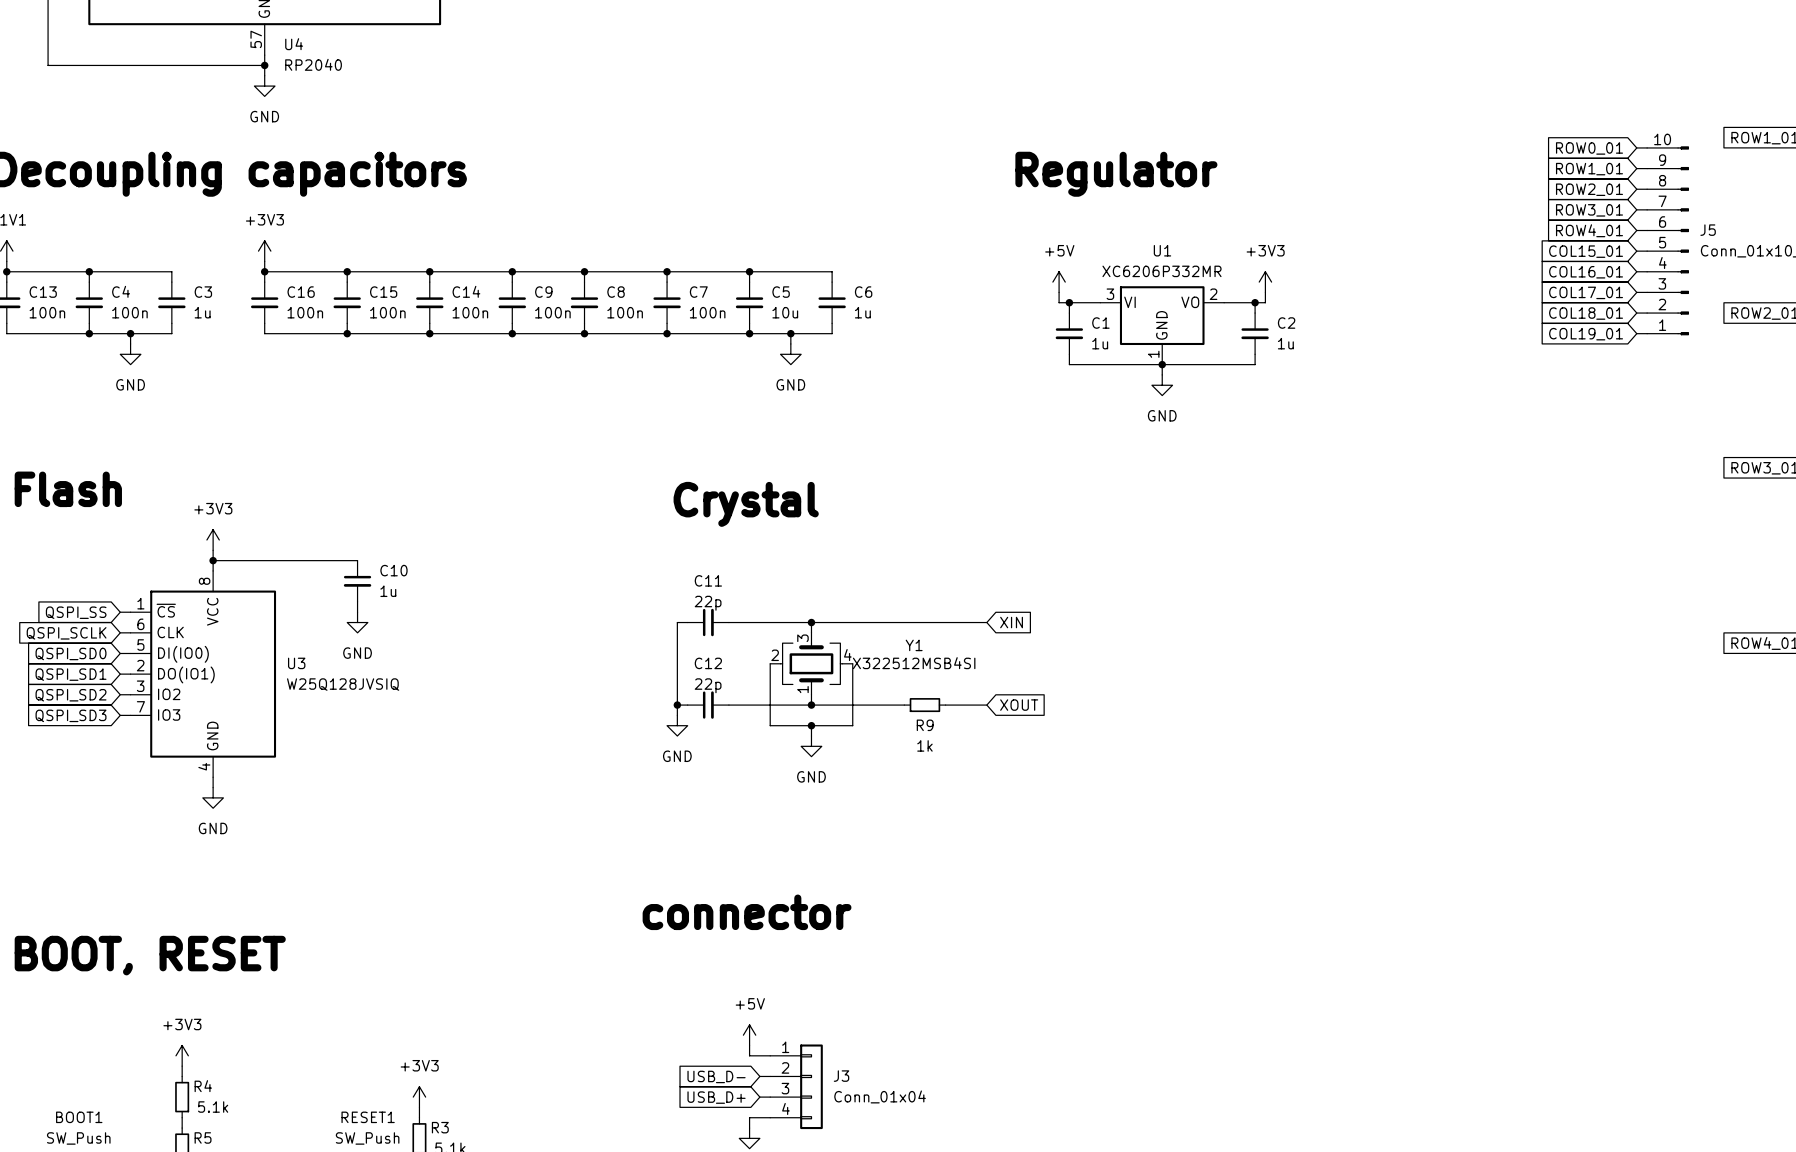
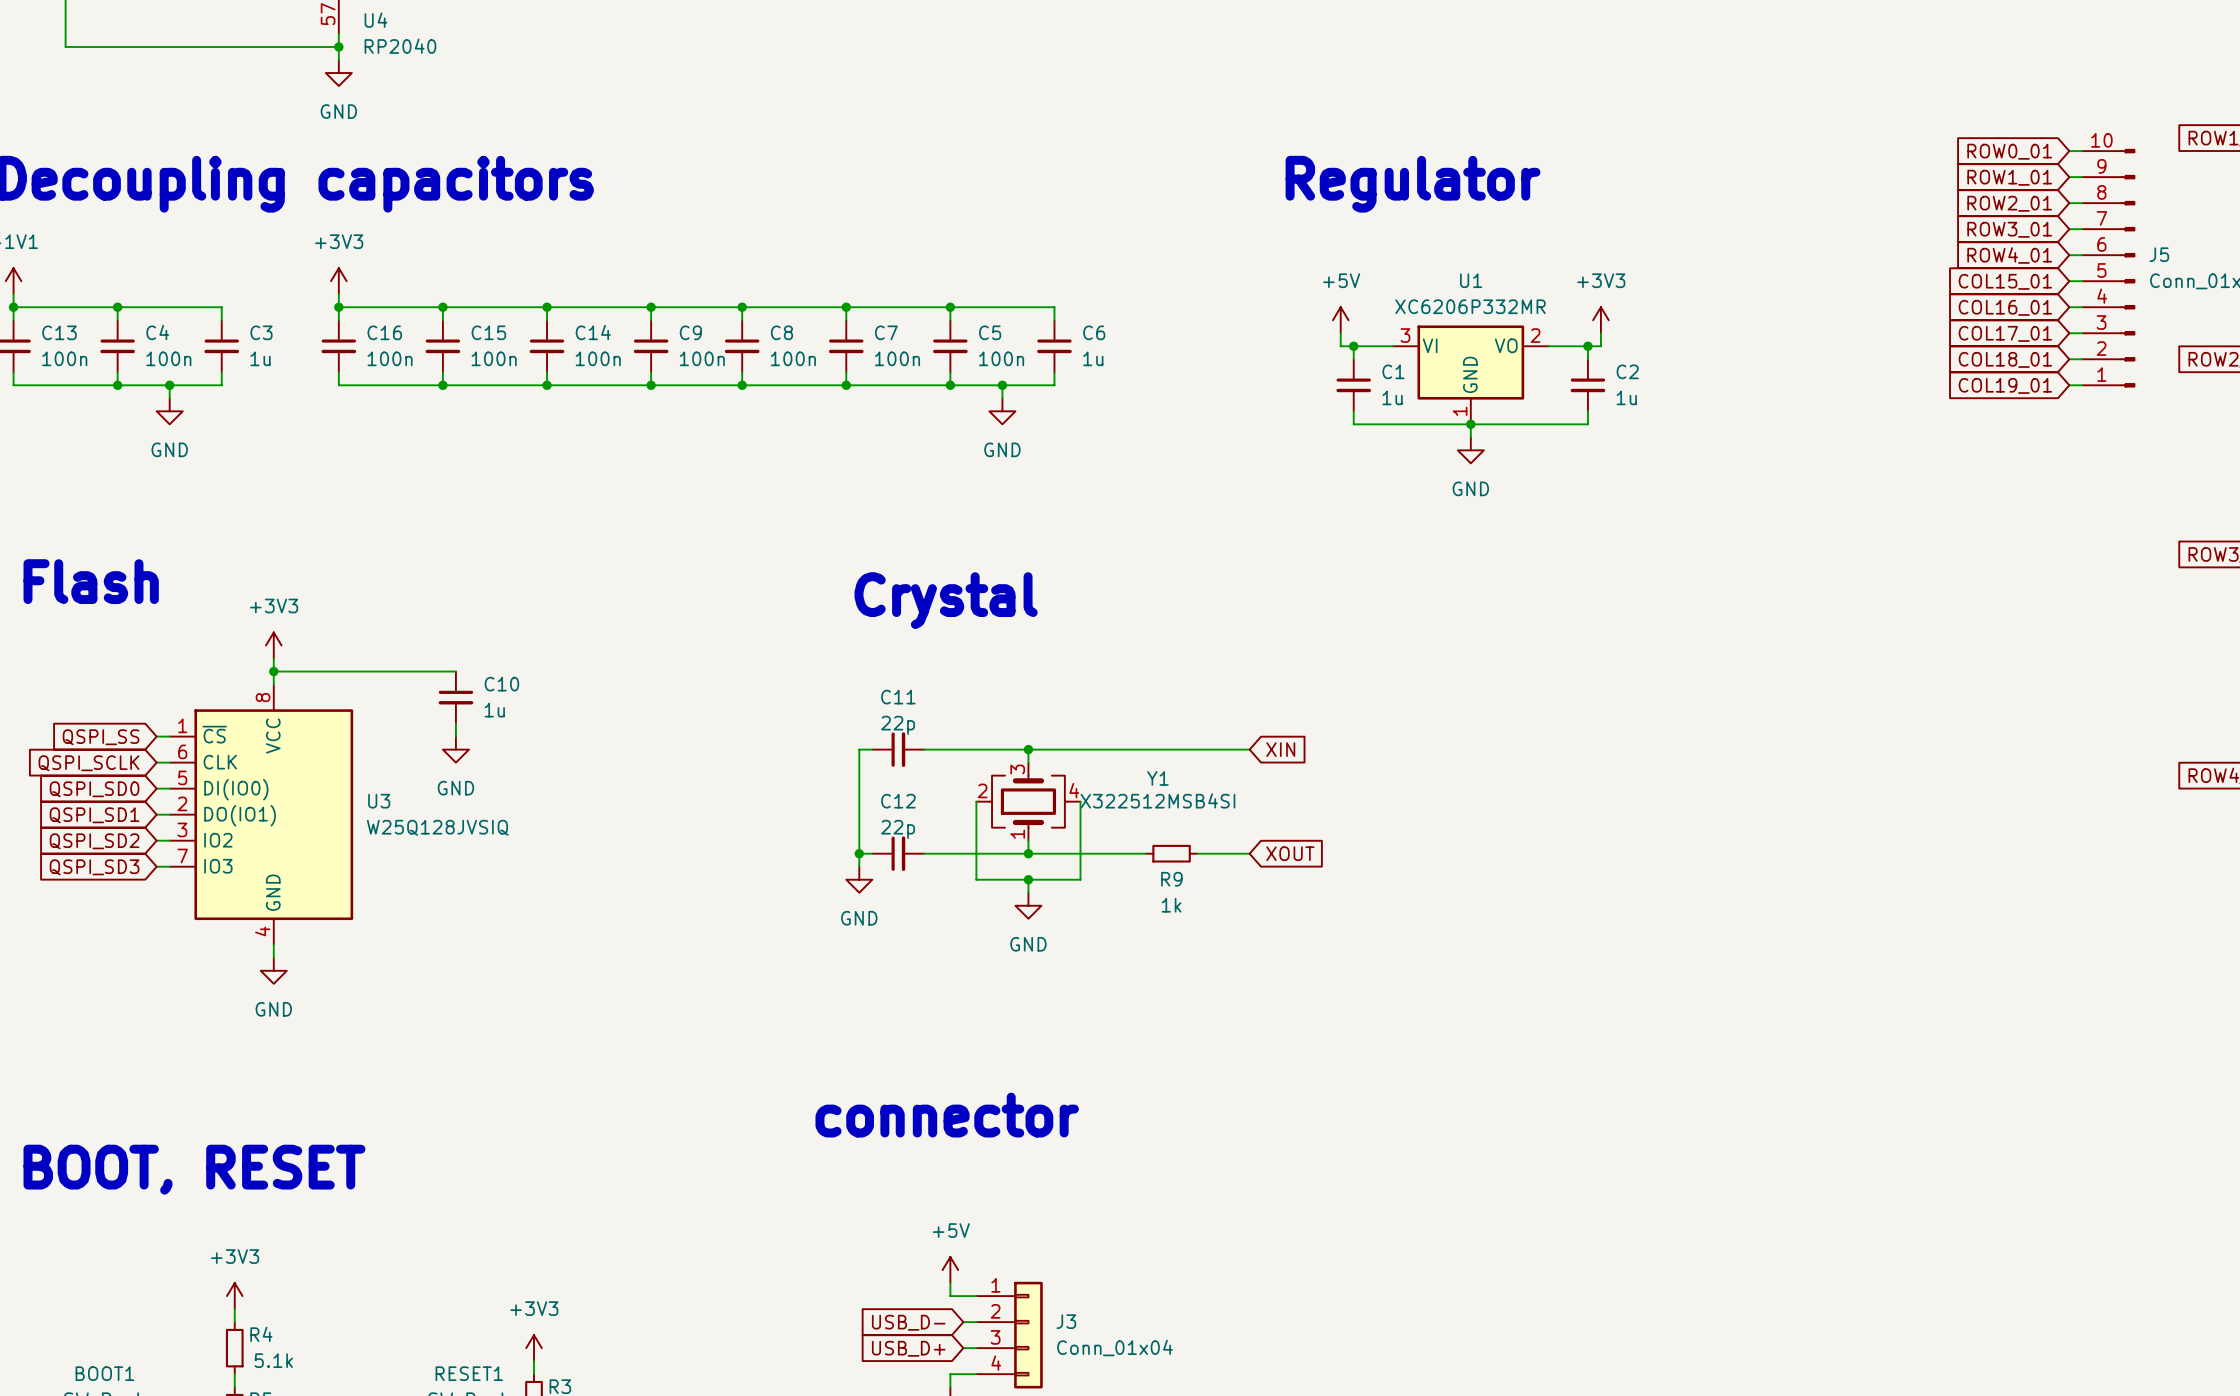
C5 value: 10u (785, 312) -> 100n (1001, 358)

